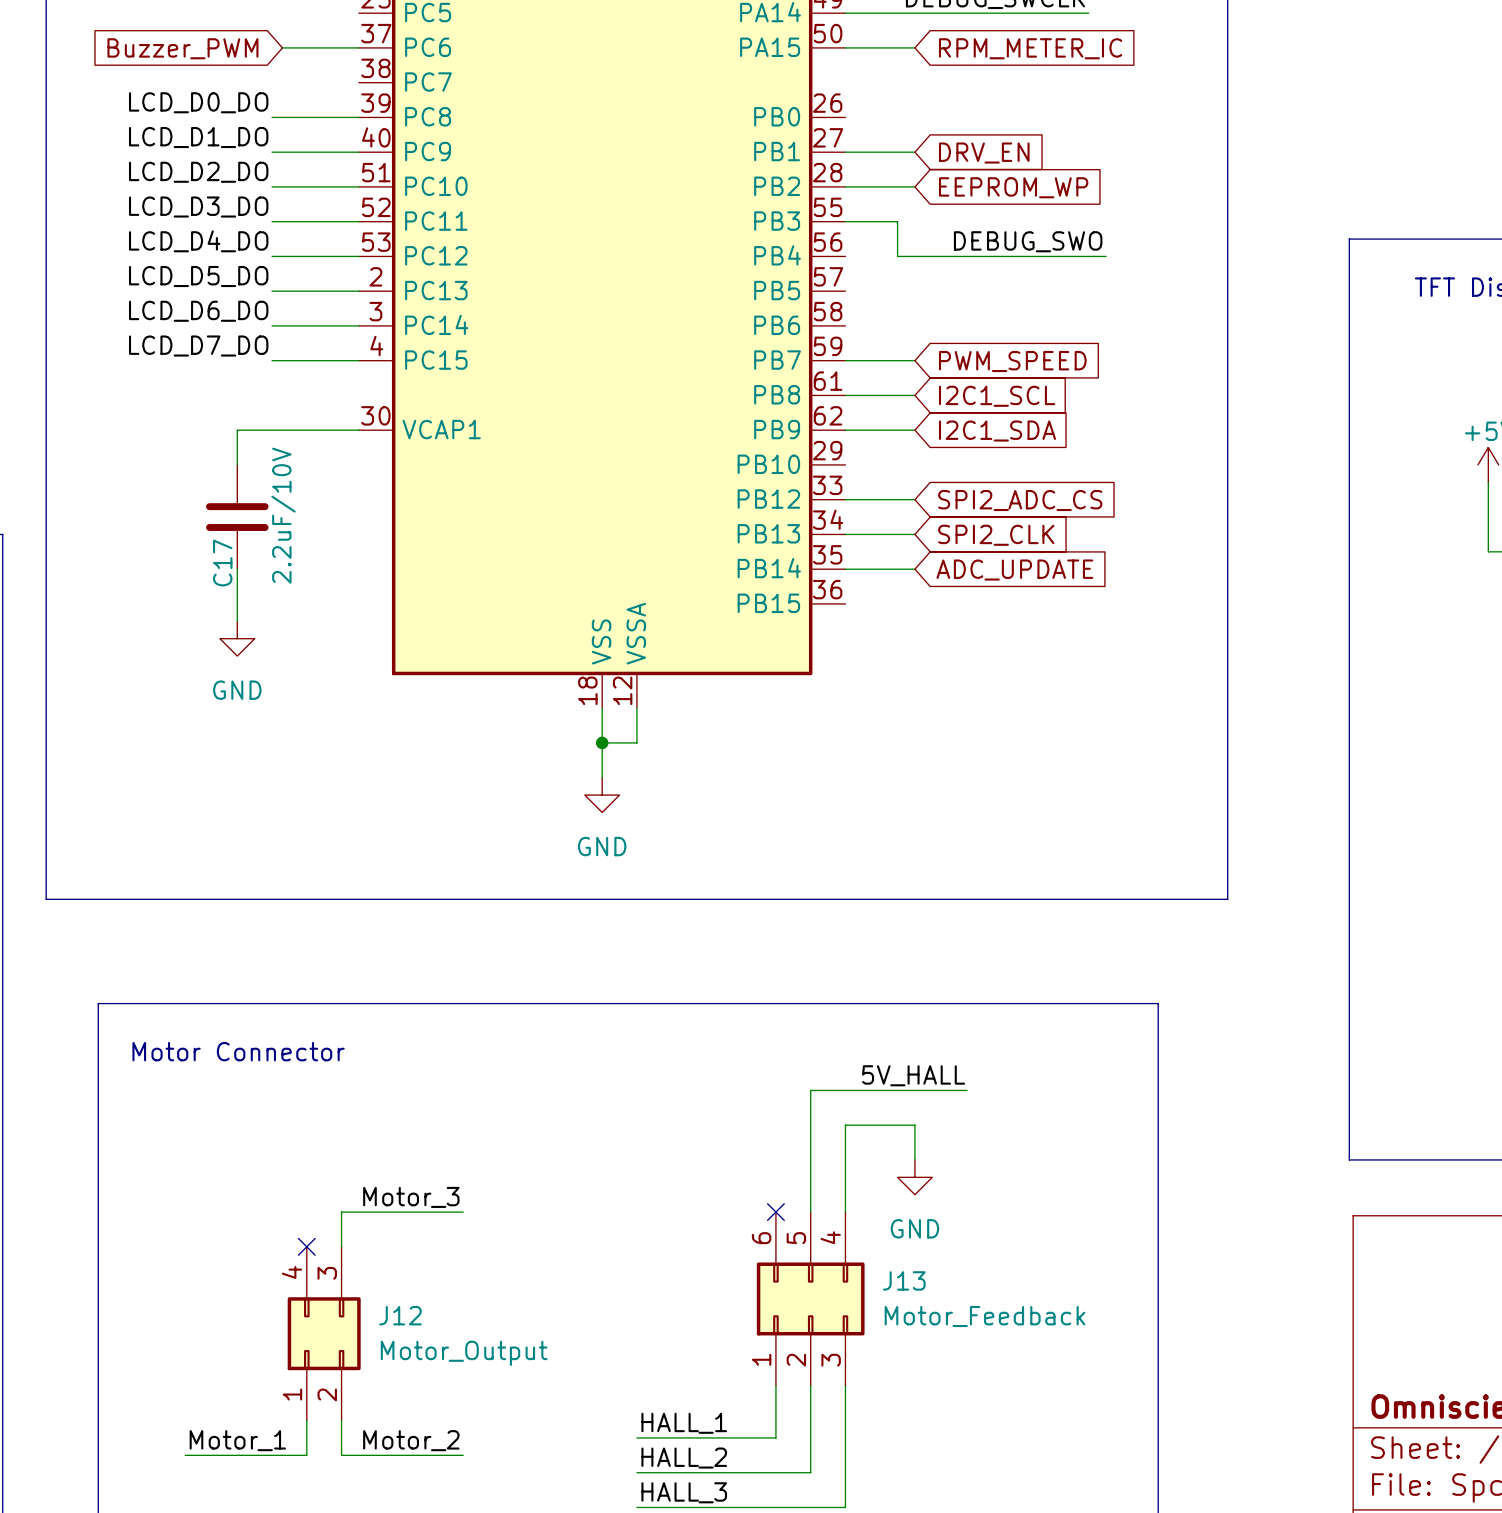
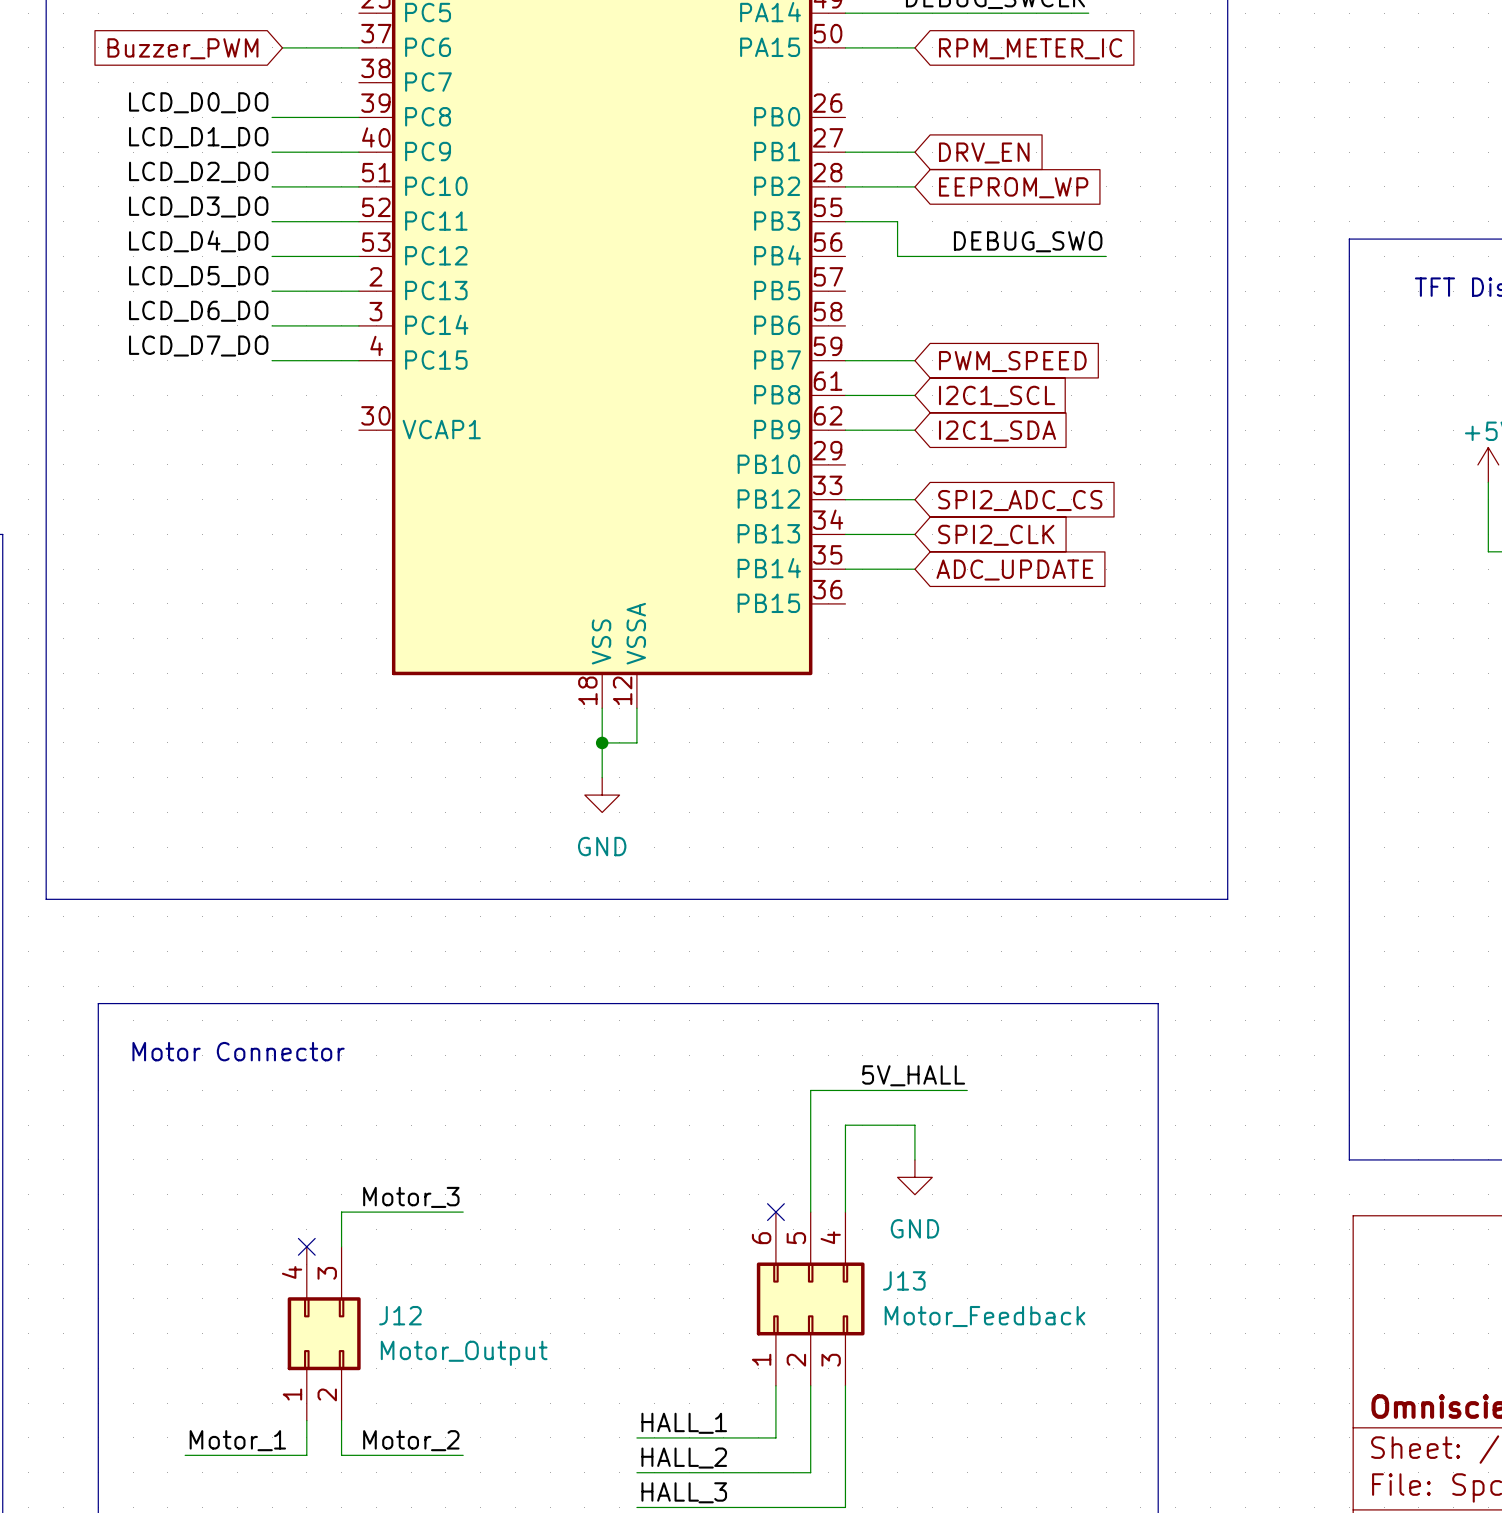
wire: (358, 430) (237, 430) (237, 464) -> none
C17: 2.2uF/10V (237, 517) -> none
wire: (237, 569) (237, 621) -> none
power symbol: GND (237, 638) -> none

